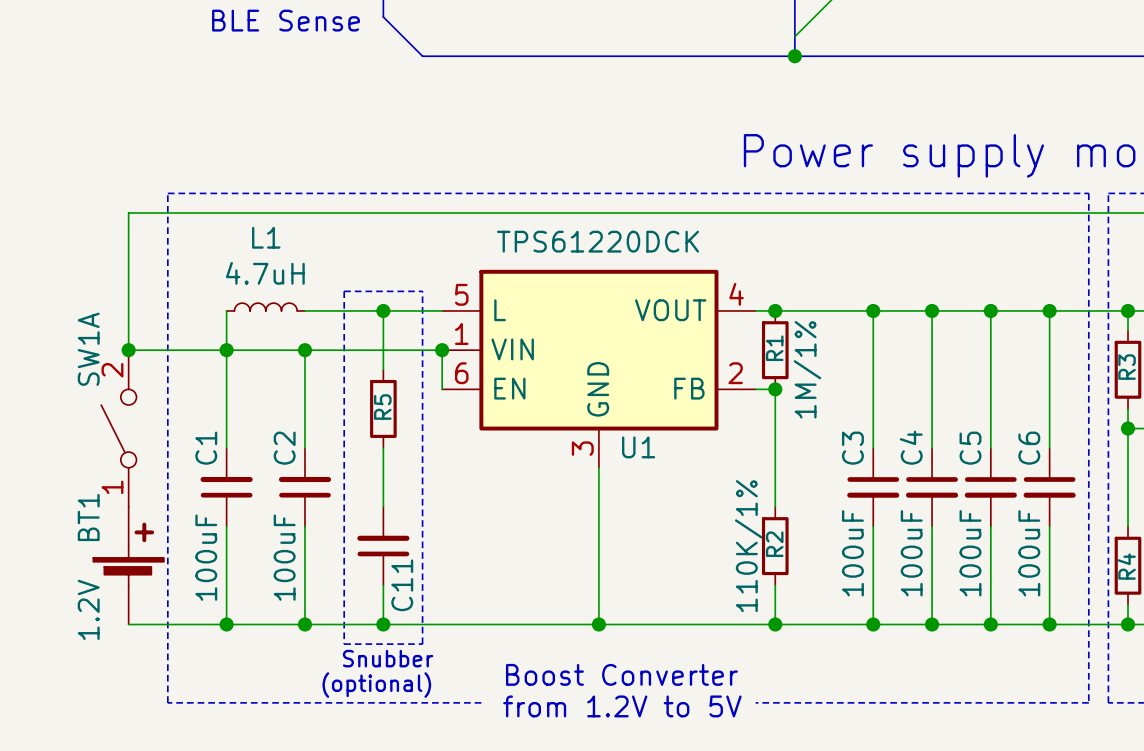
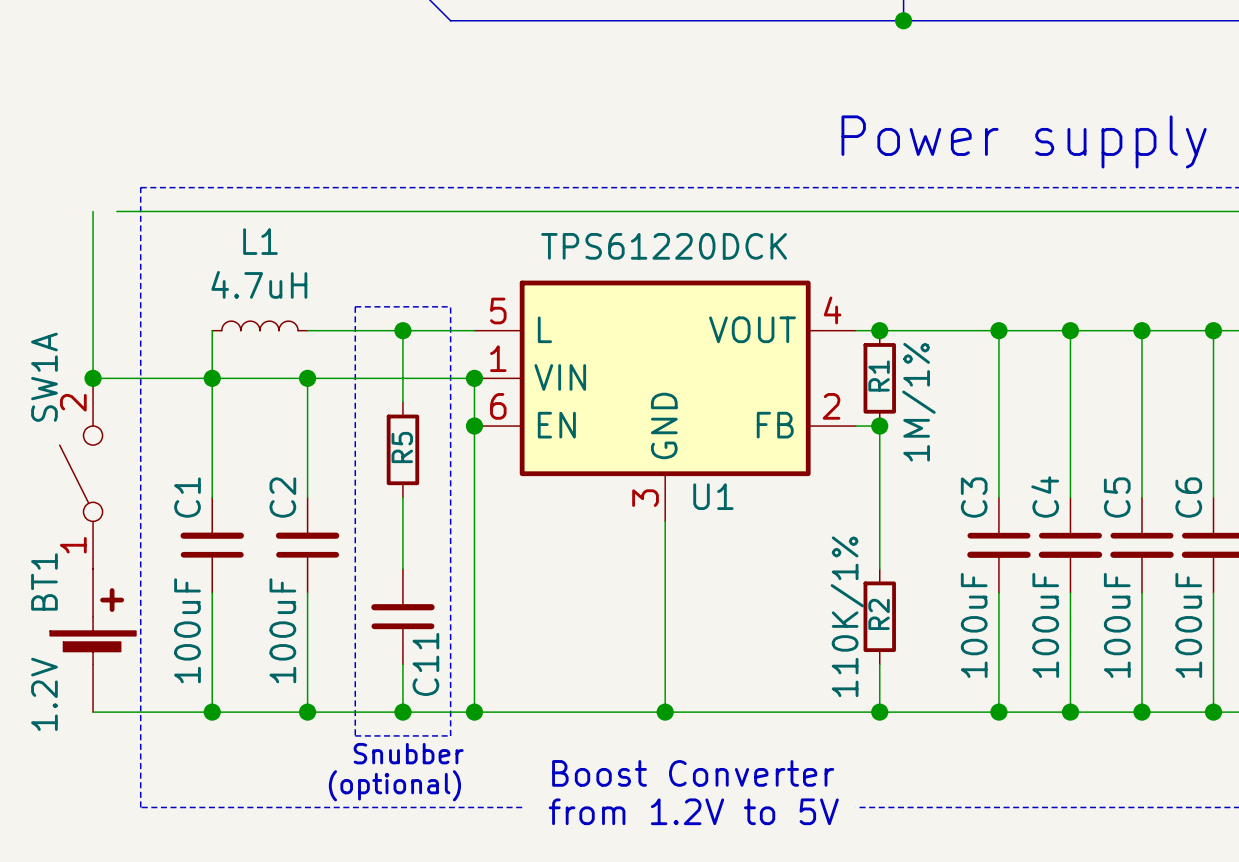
wire: (128, 213) (148, 213) -> none
wire: none -> (474, 426) (474, 712)
junction: none -> (474, 426)
junction: none -> (474, 712)

